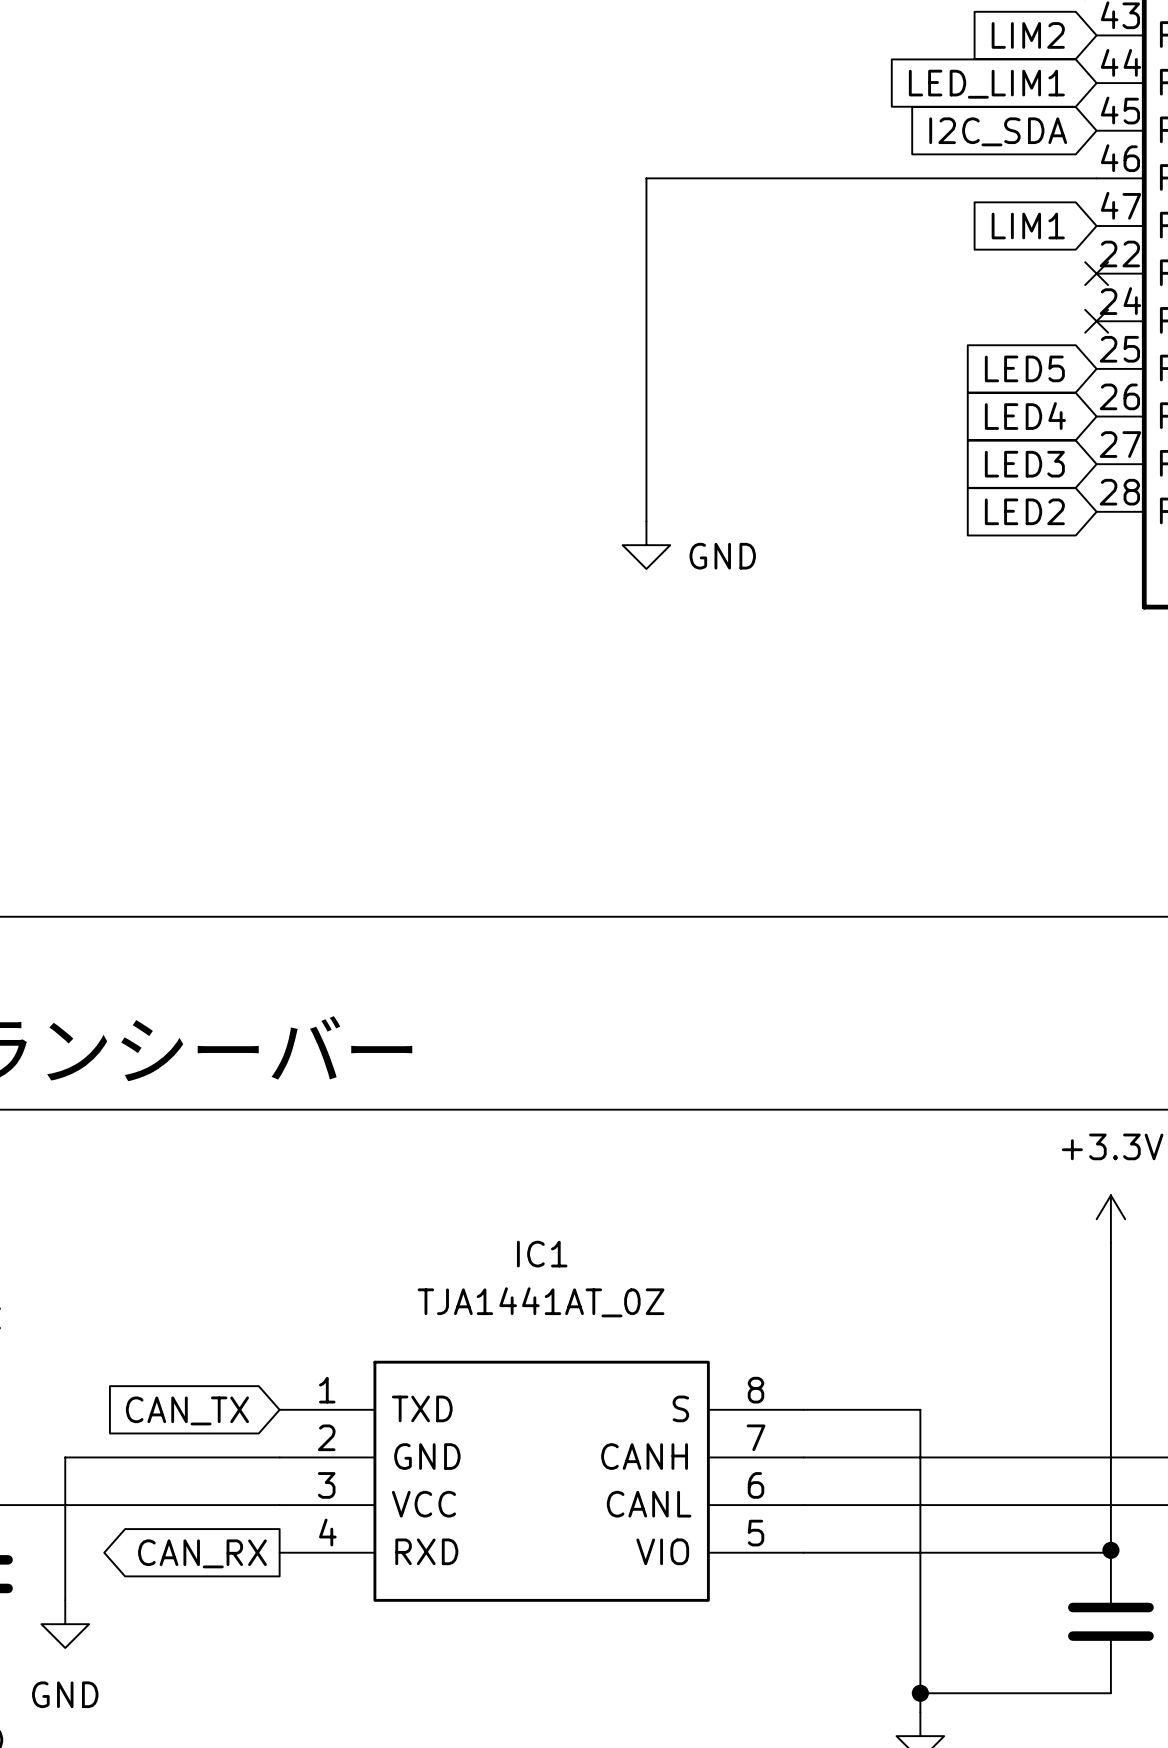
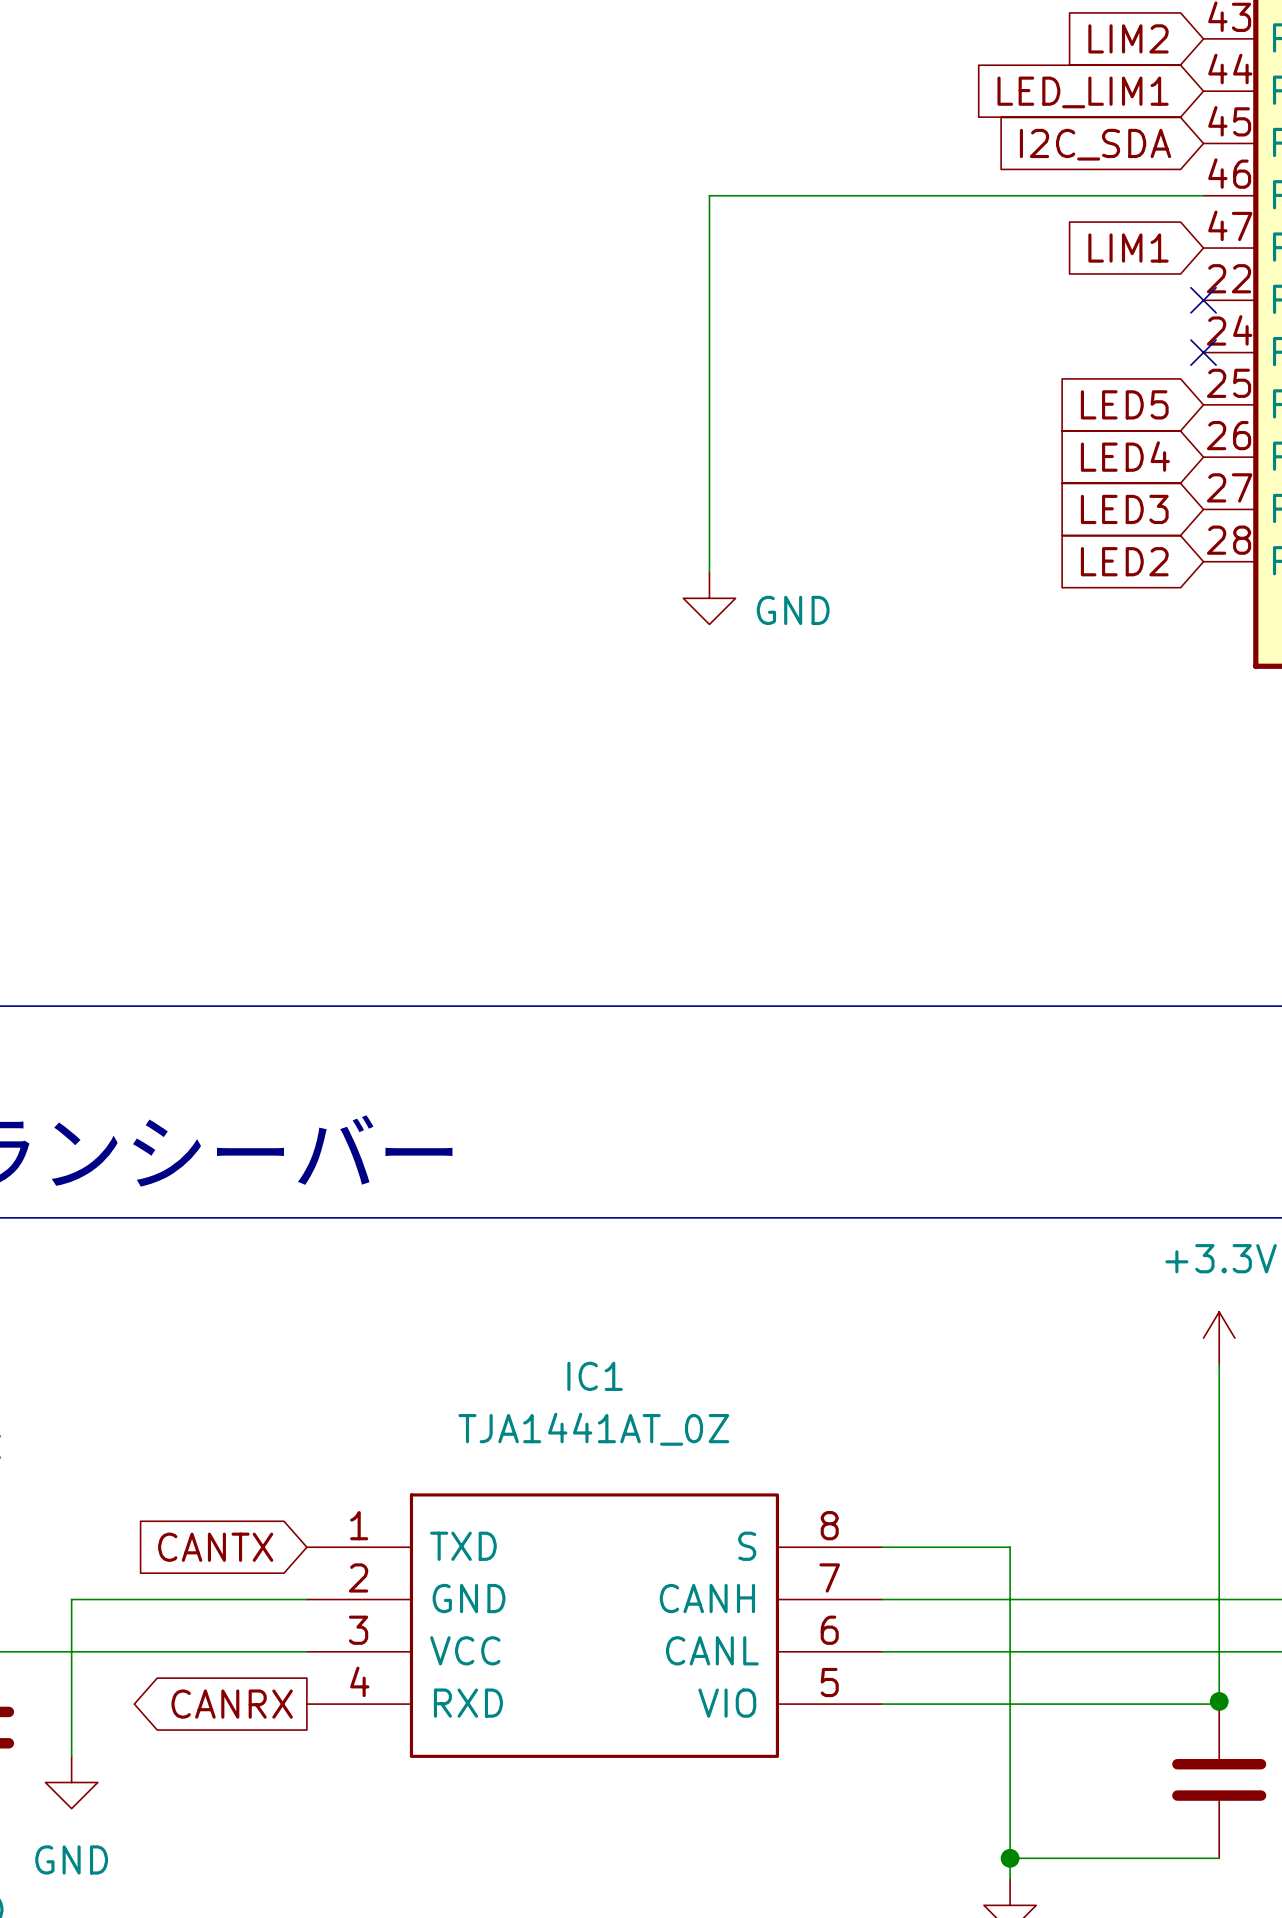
global label: CAN_TX (187, 1410) -> CANTX (215, 1547)
global label: CAN_RX (202, 1553) -> CANRX (232, 1704)

